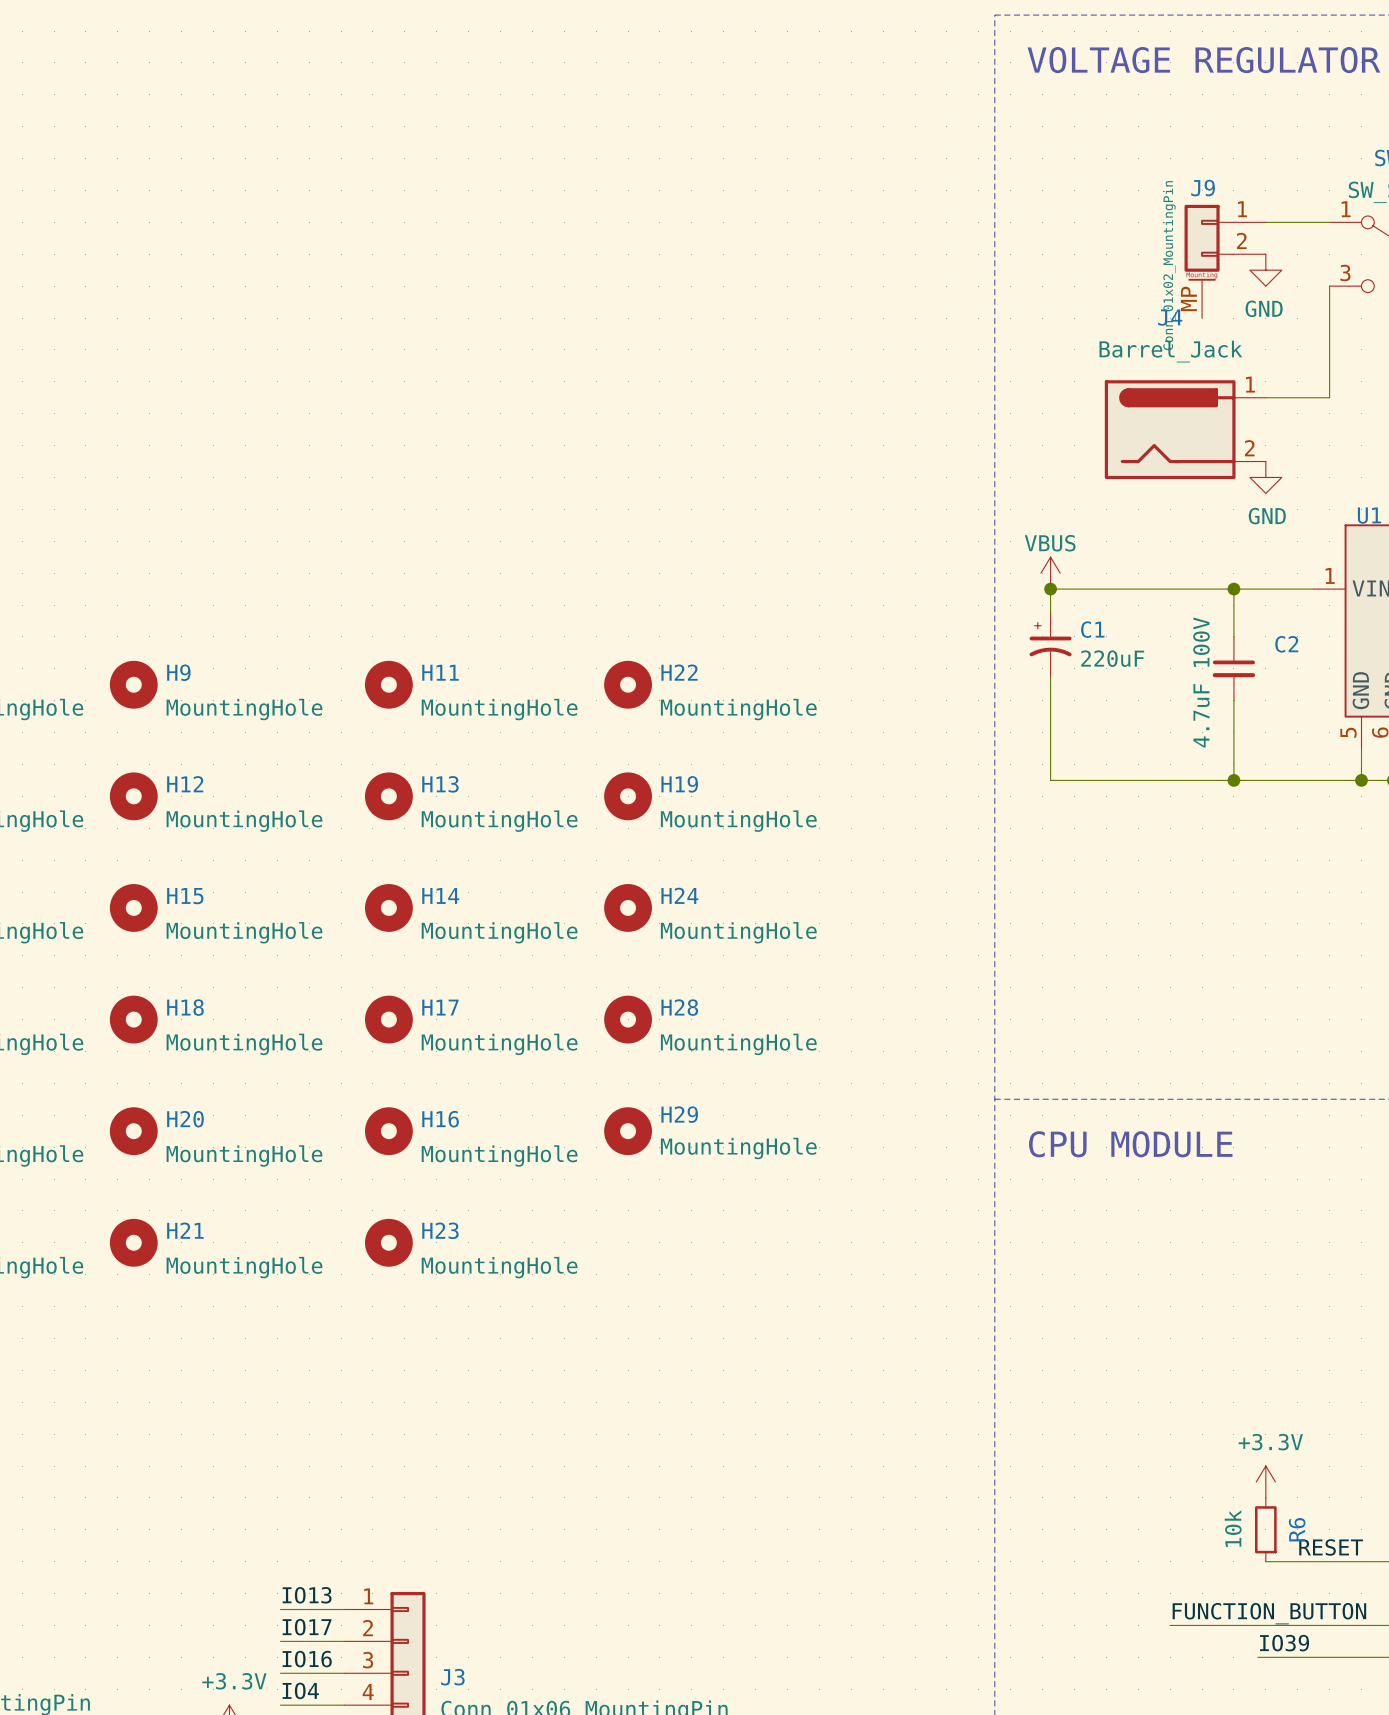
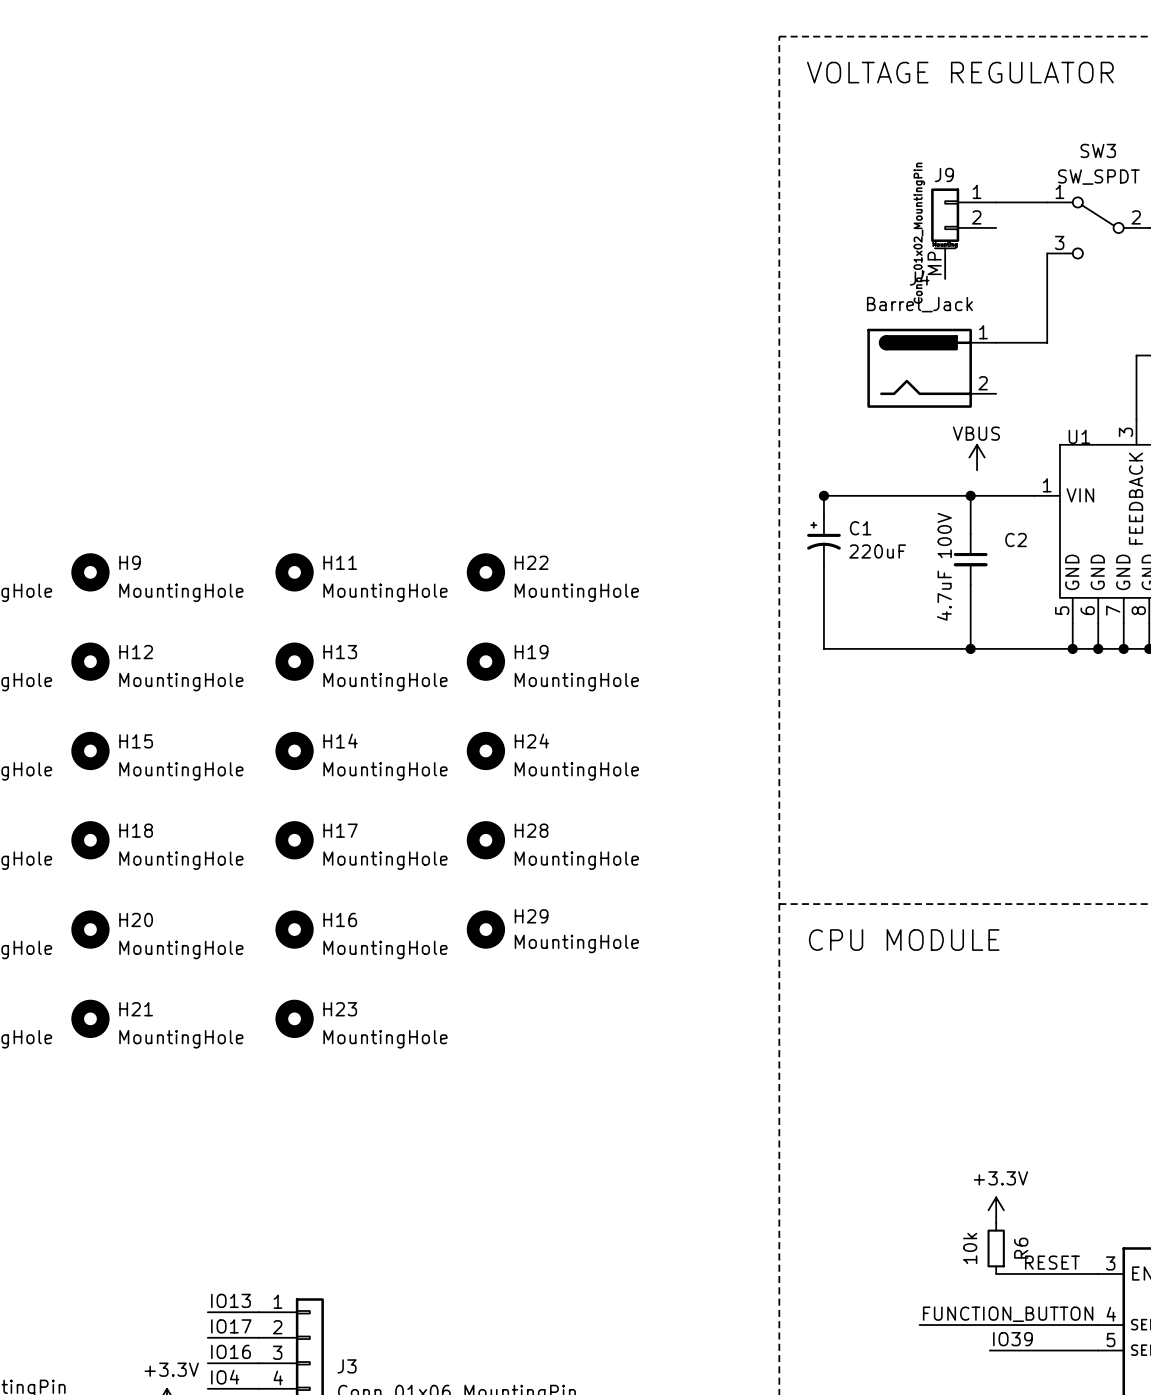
power symbol: GND (1265, 270) -> none
power symbol: GND (1265, 477) -> none
power symbol position: VBUS (1050, 573) -> VBUS (977, 457)

